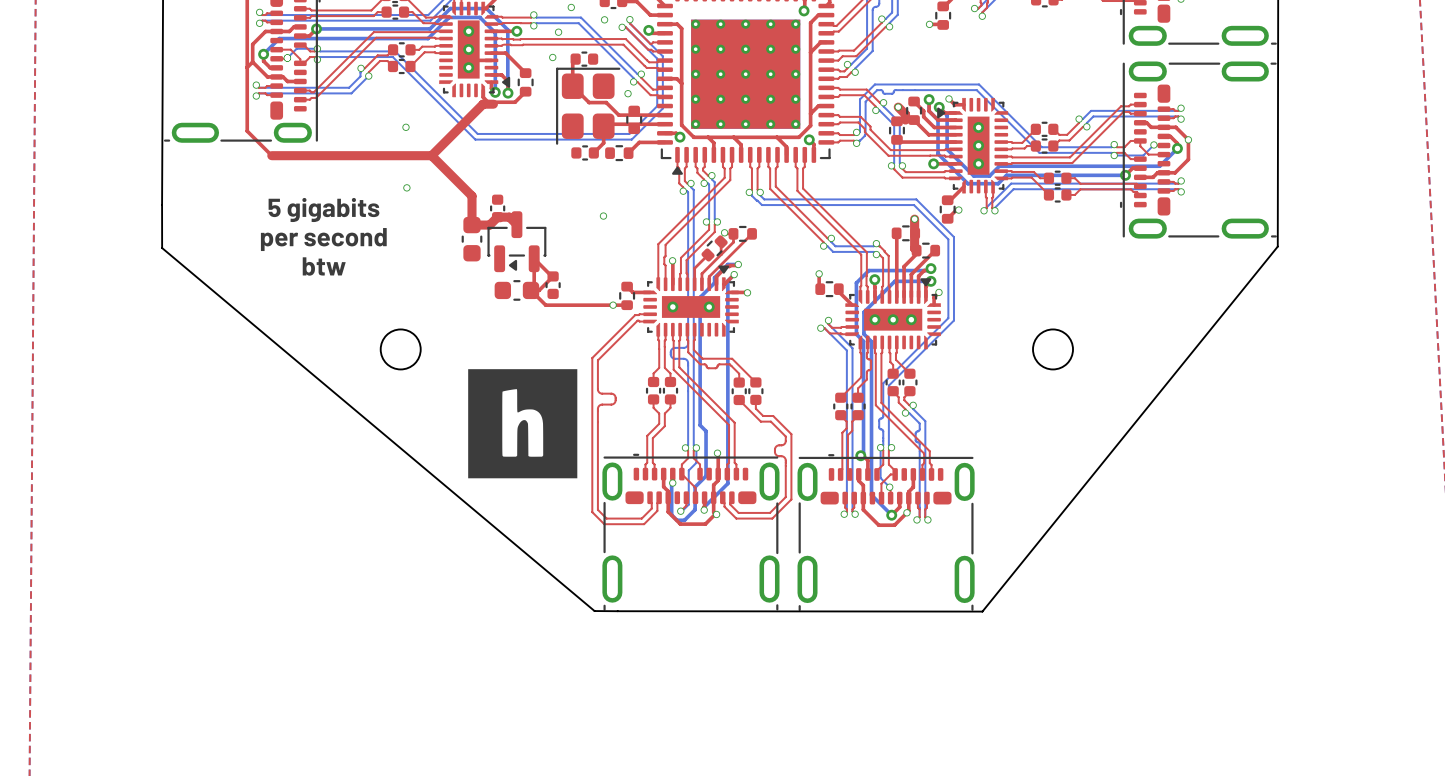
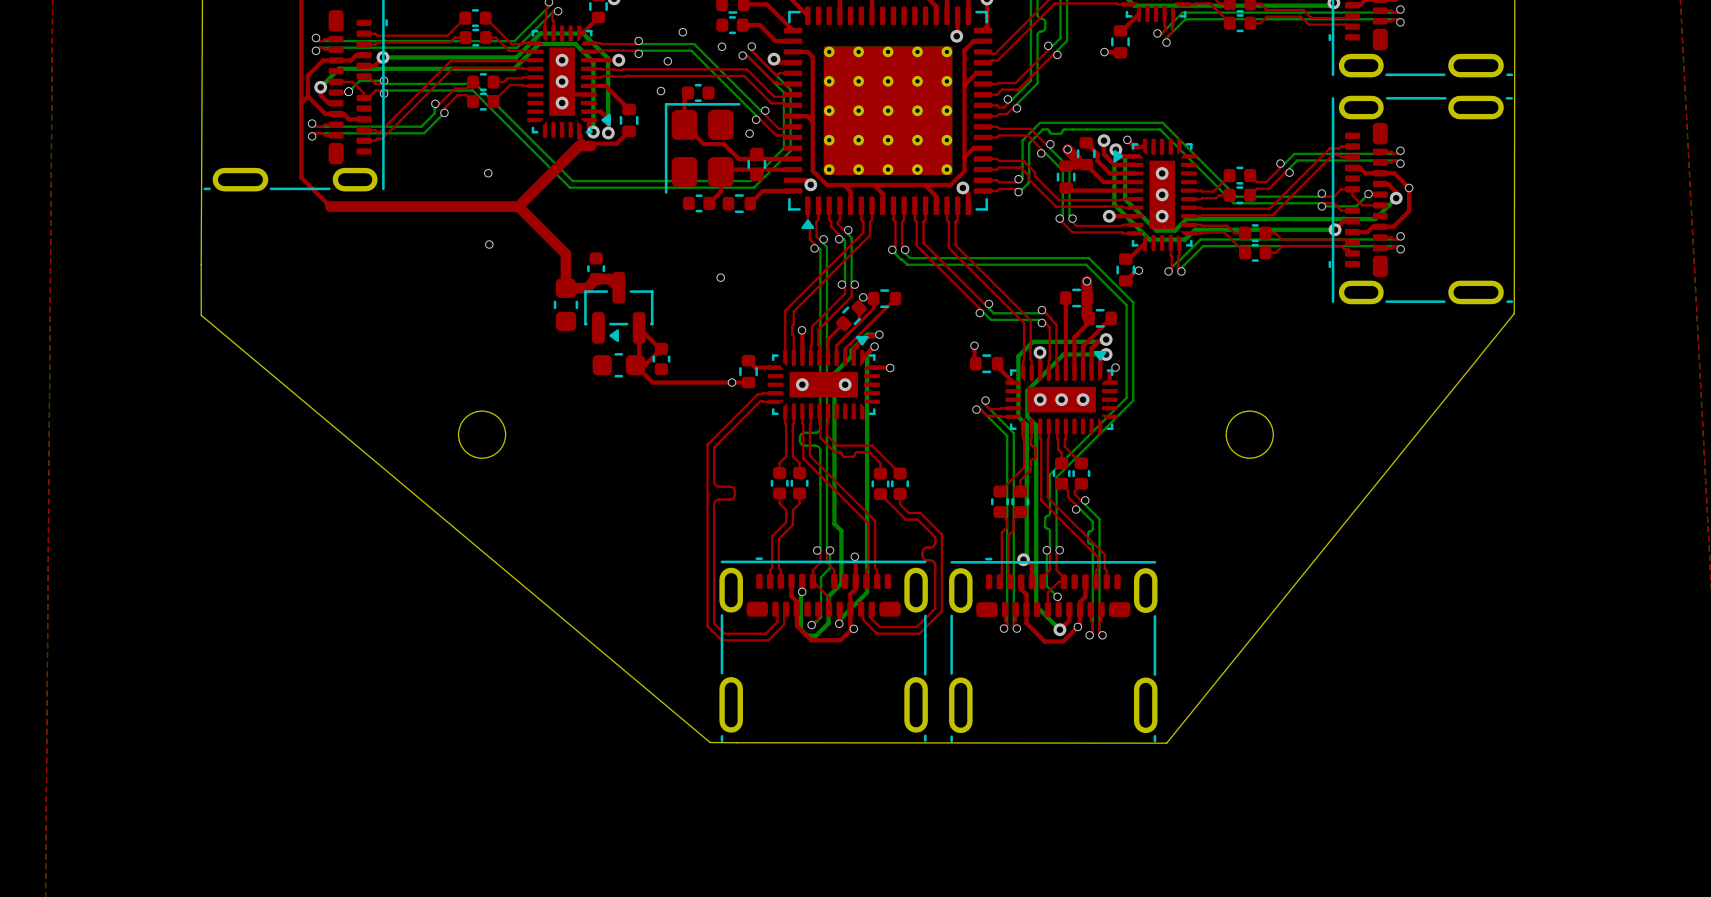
text: 5 gigabits (323, 210) -> none
text: per second (323, 239) -> none
text: btw (324, 266) -> none
drawing: [468, 369, 578, 479] -> none

